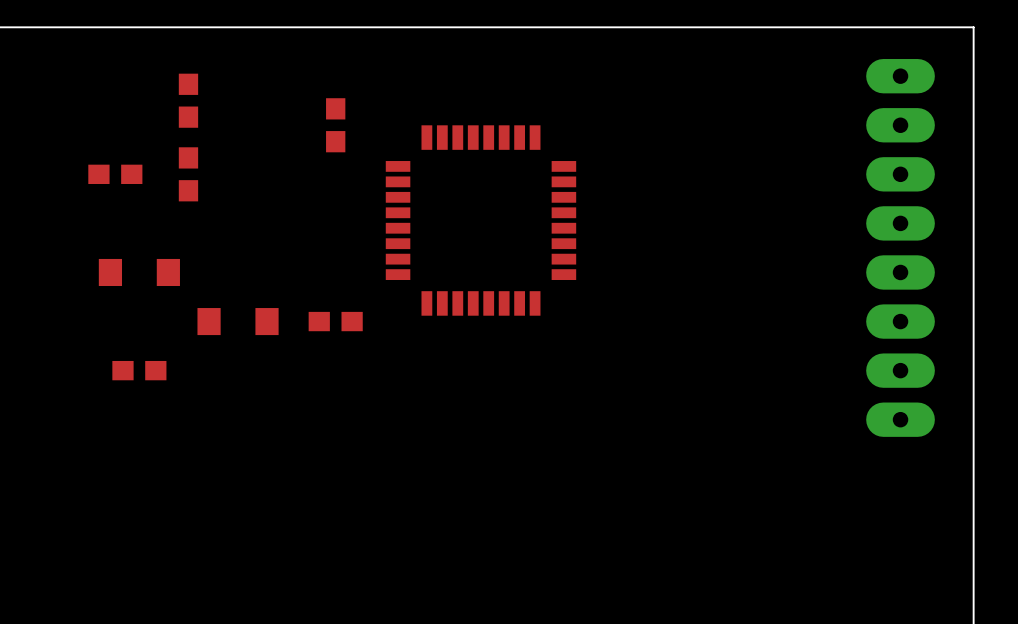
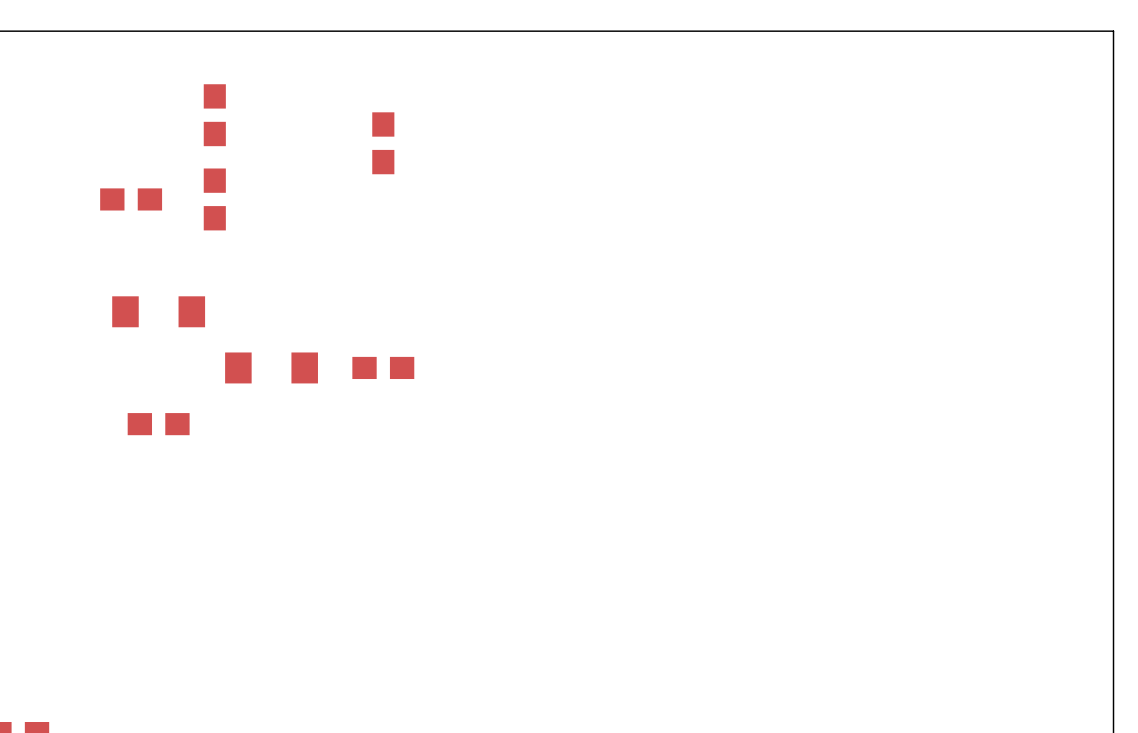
part: (480, 220) -> none
part: (900, 247) -> none

